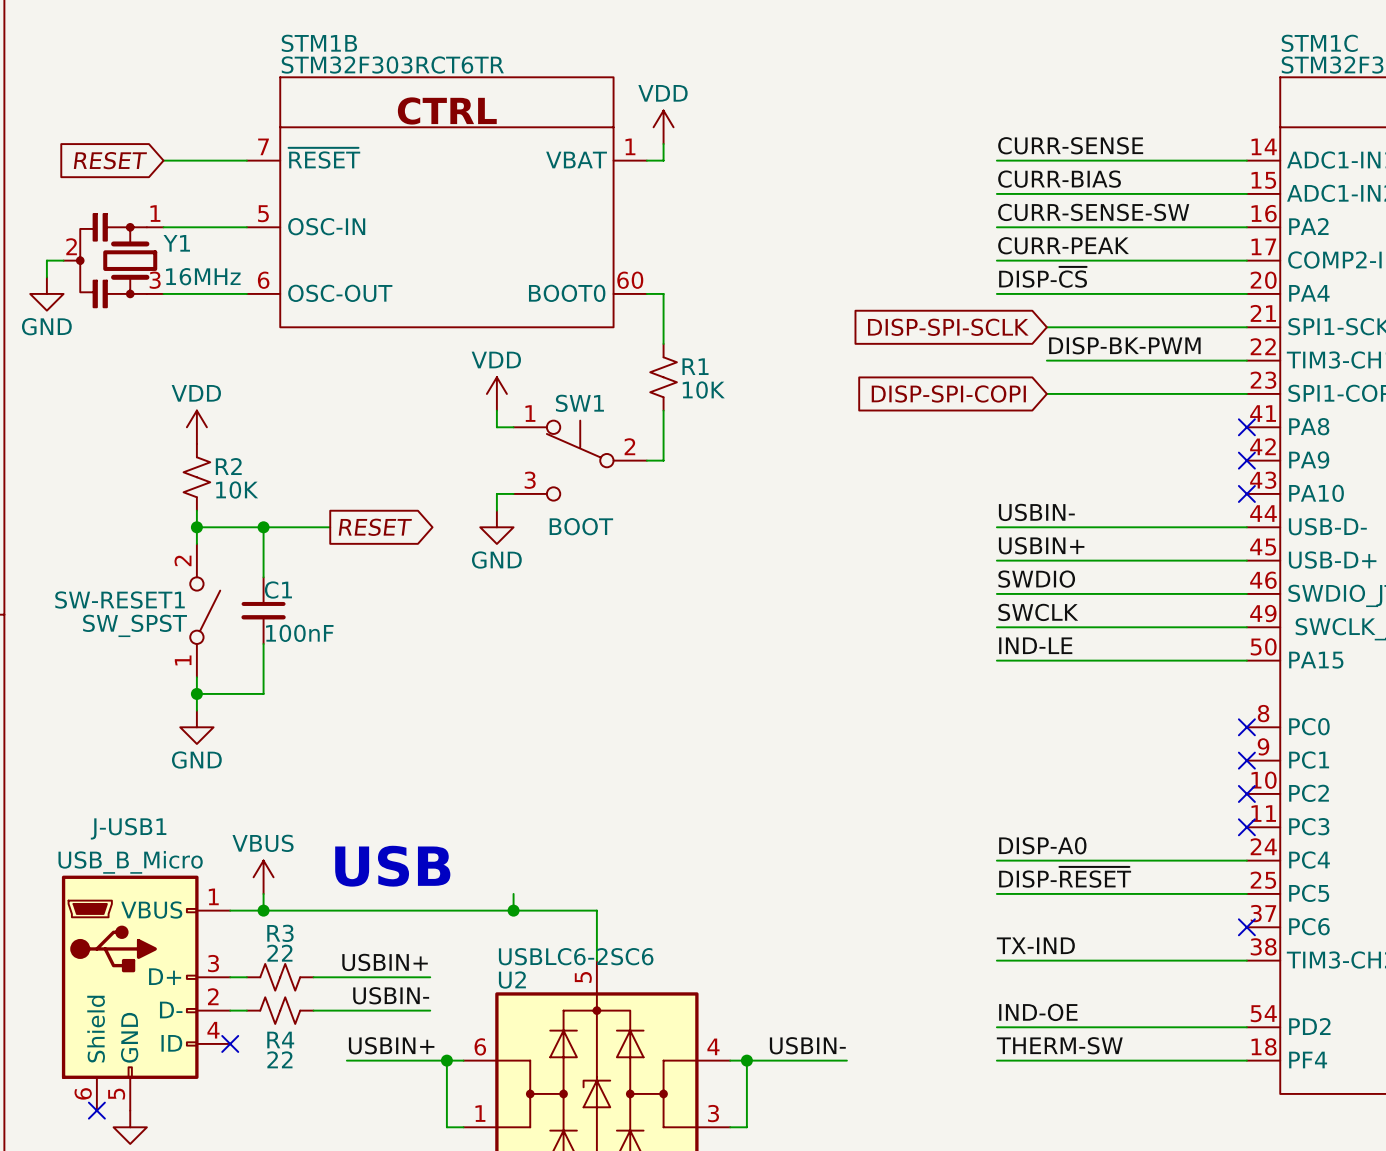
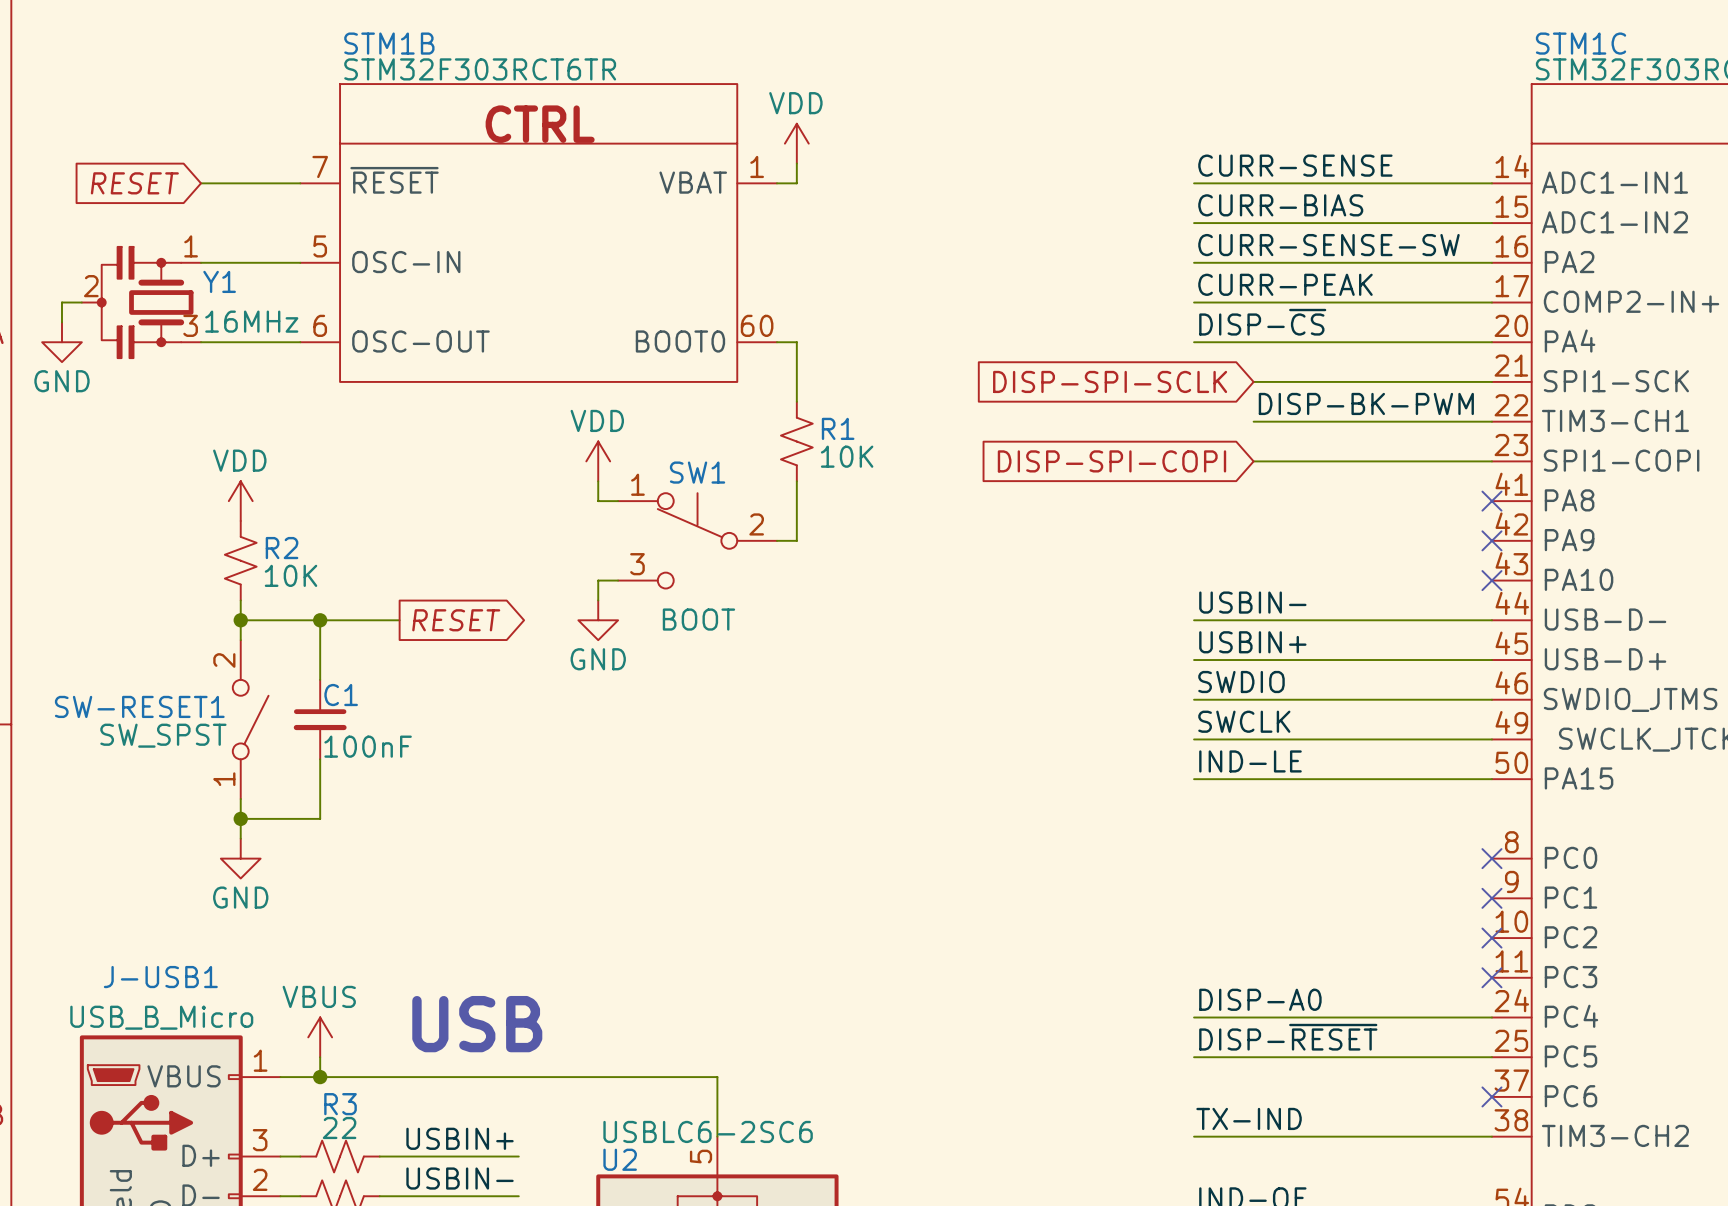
wire: (513, 893) (513, 910) -> none
junction: (513, 910) -> none

